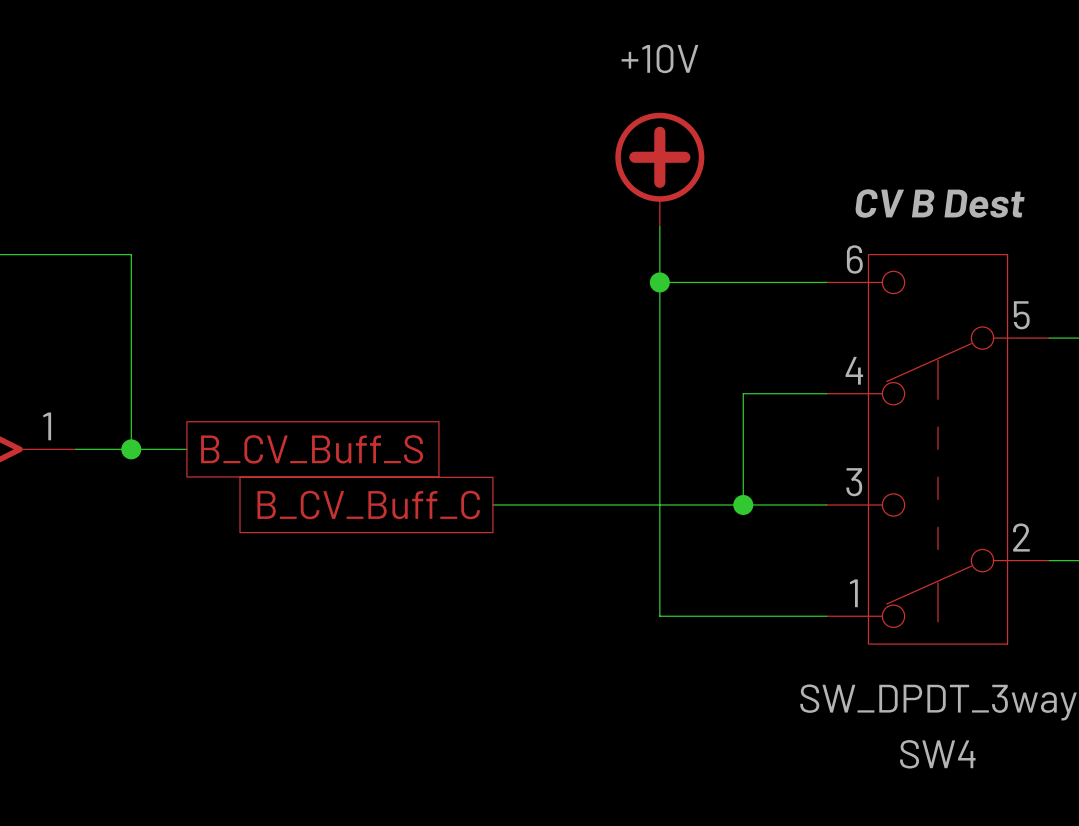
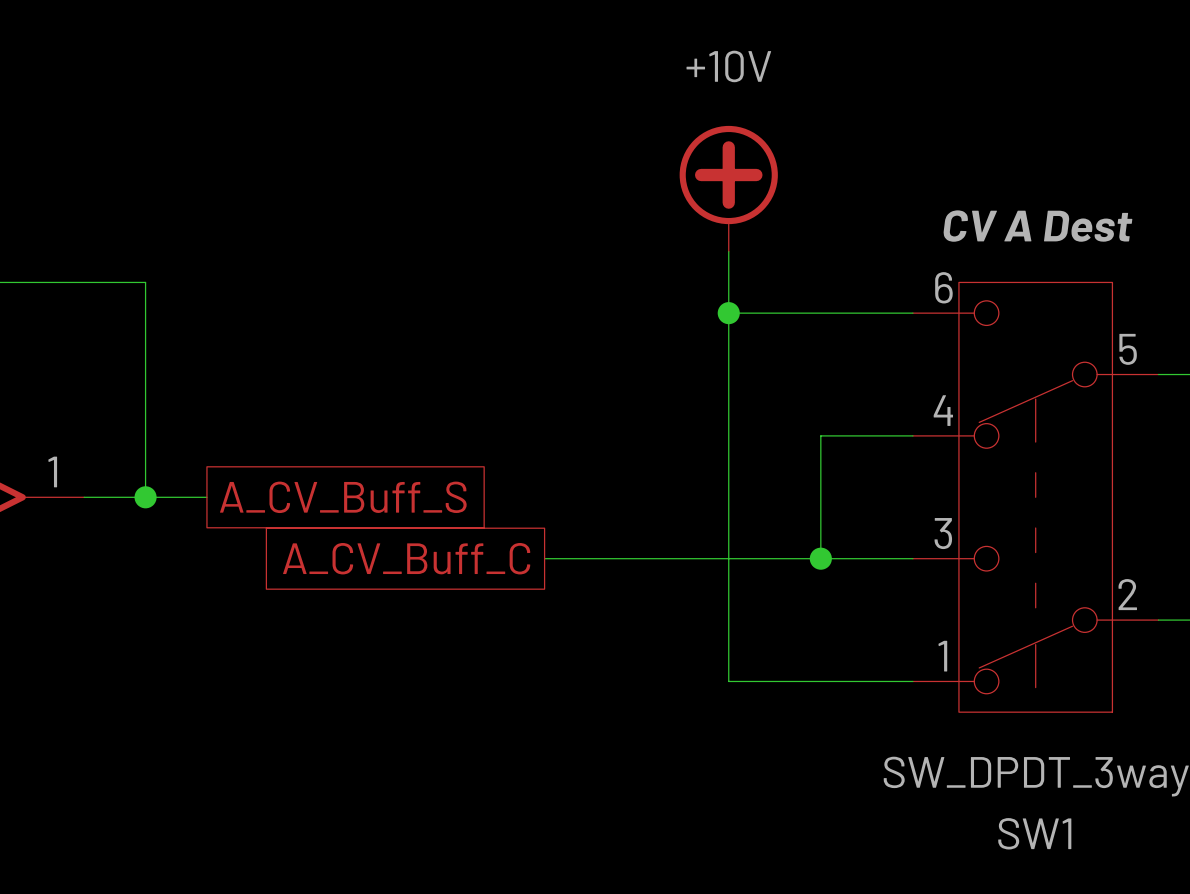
SW4 text: CV B Dest (939, 203) -> CV A Dest (1037, 226)
global label: B_CV_Buff_S (312, 449) -> A_CV_Buff_S (343, 497)
global label: B_CV_Buff_C (368, 505) -> A_CV_Buff_C (406, 558)
SW4 name: SW4 (937, 754) -> SW1 (1034, 833)

